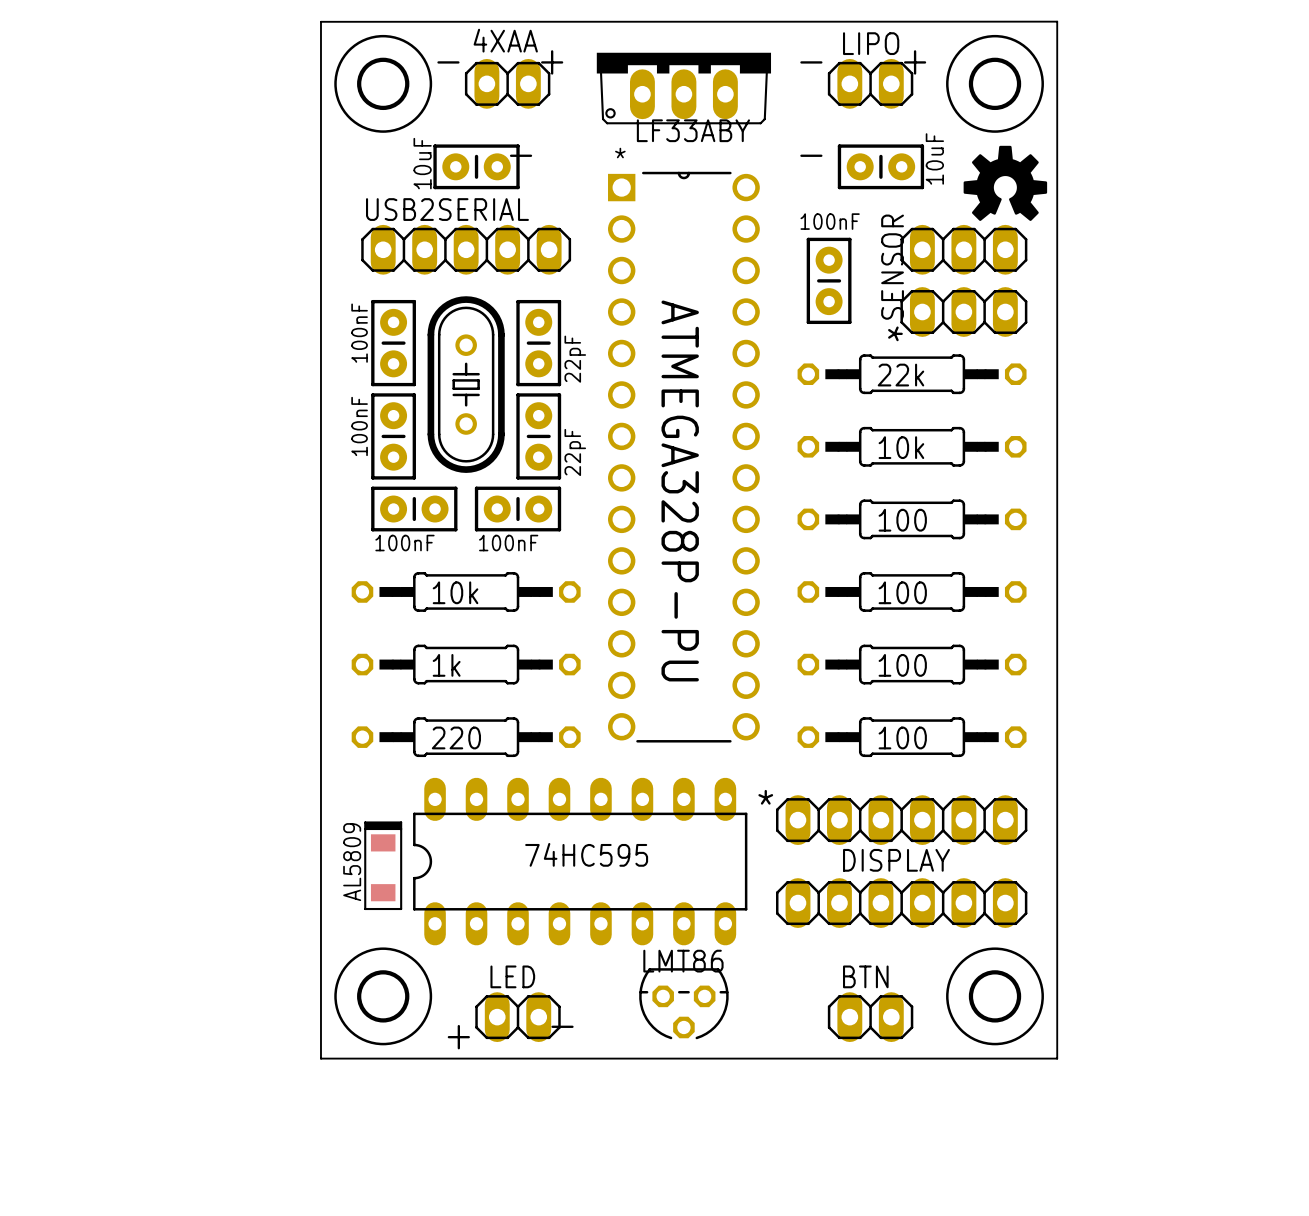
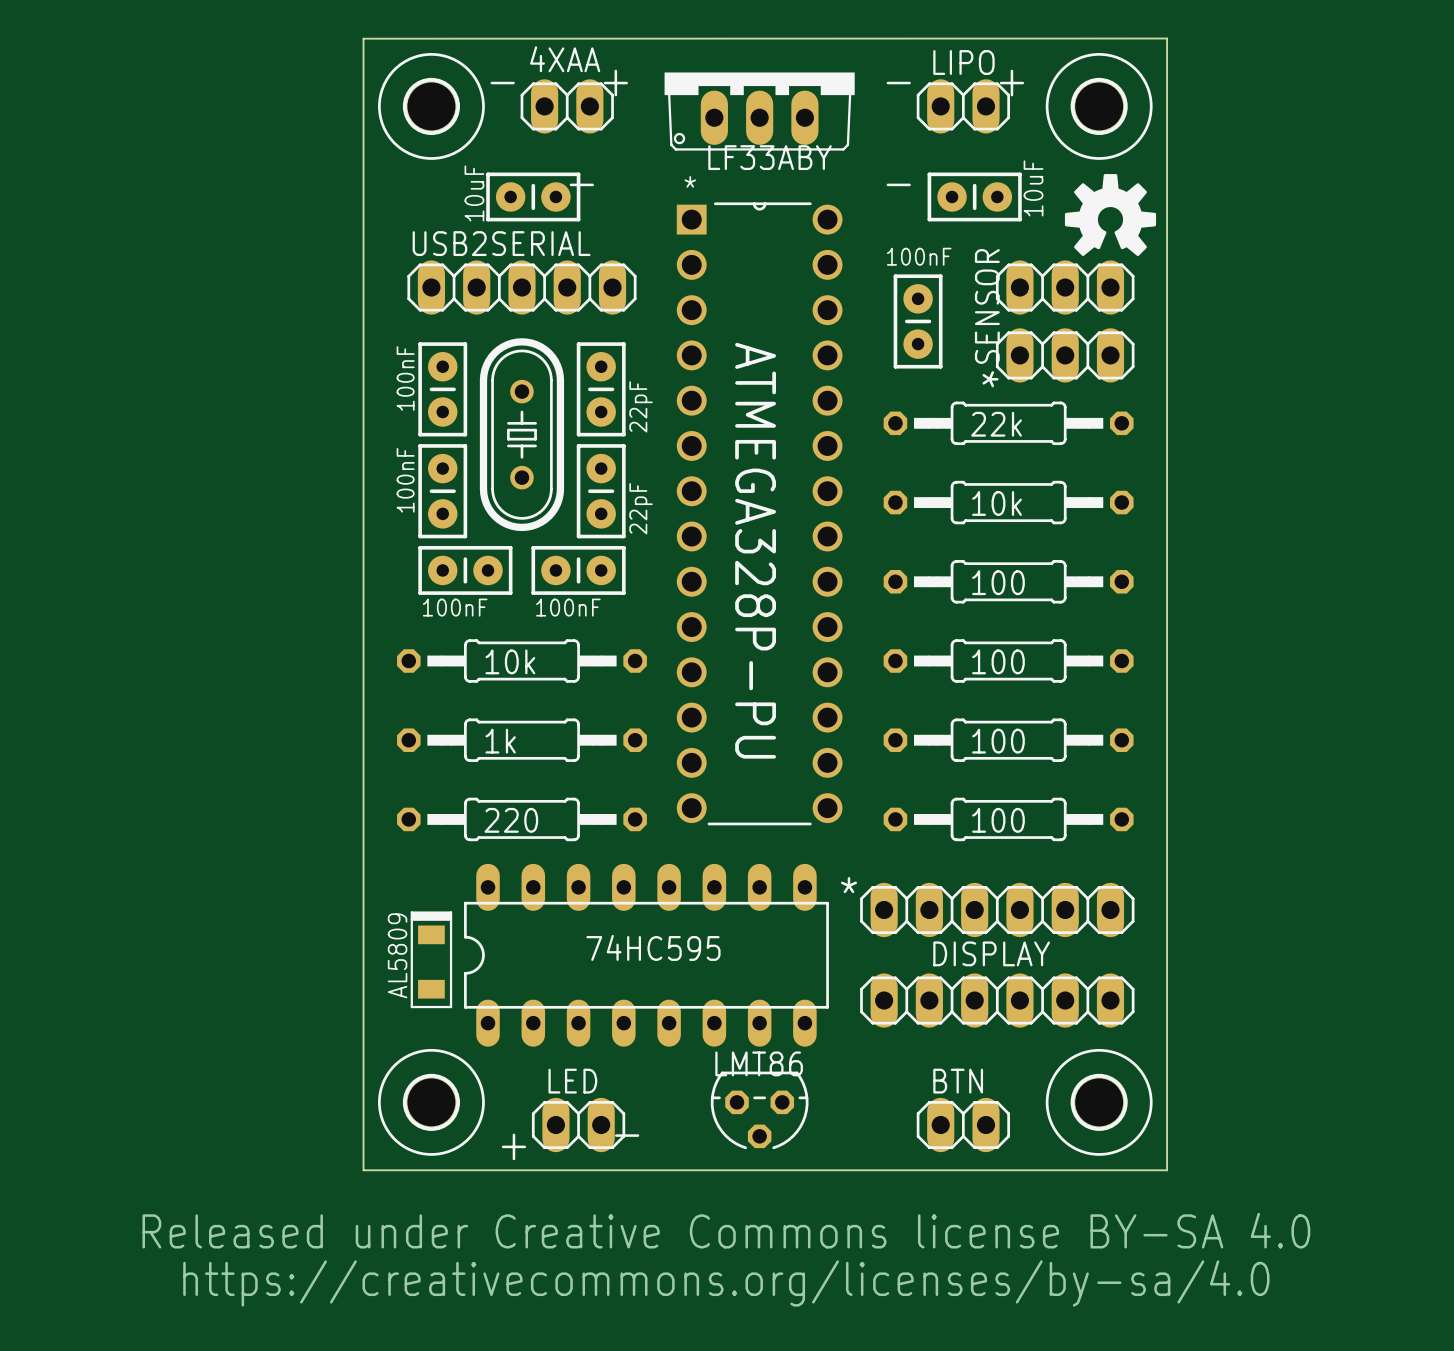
text: none -> Released under Creative Commons license BY-SA 4.0 (726, 1230)
text: none -> https://creativecommons.org/licenses/by-sa/4.0 (726, 1283)

